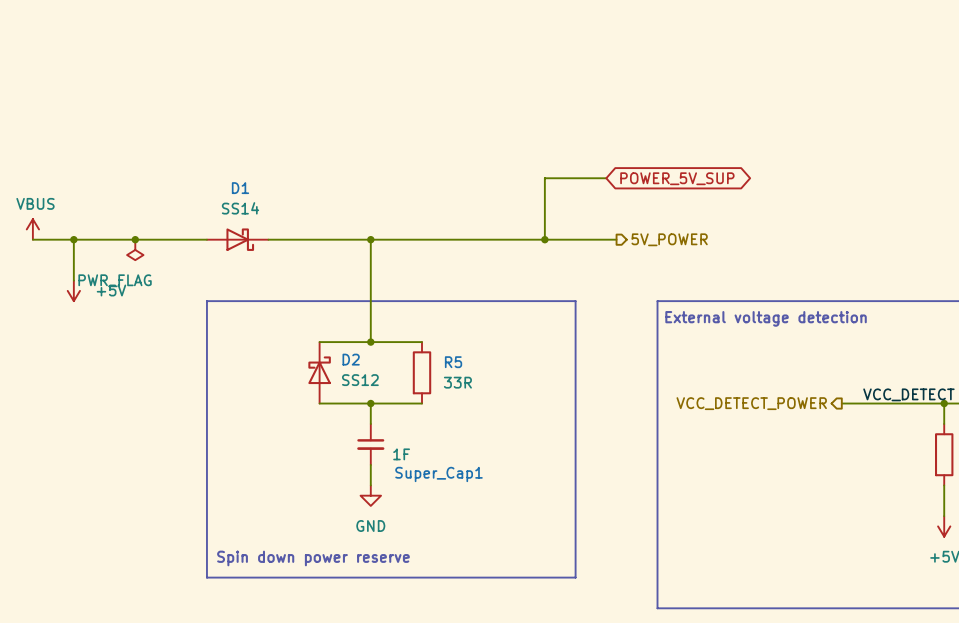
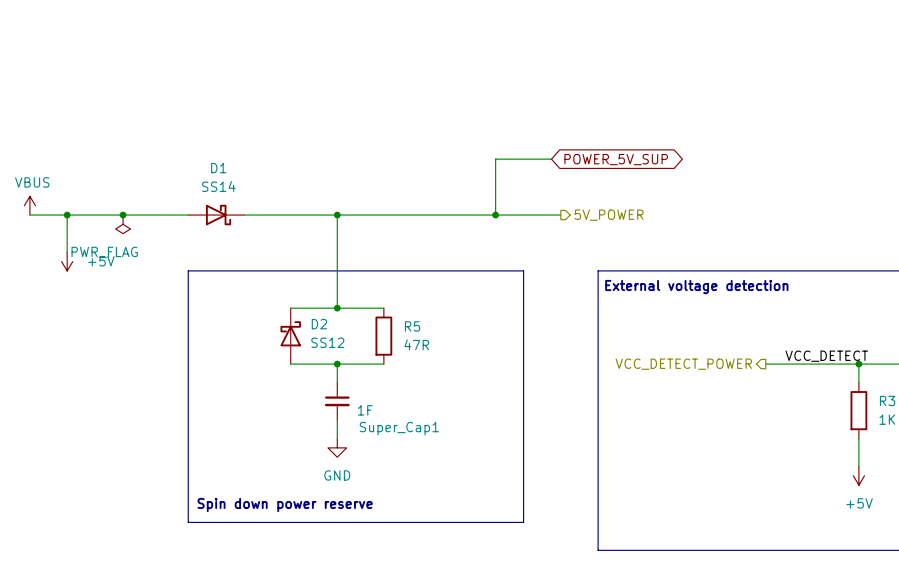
R5 value: 33R (457, 382) -> 47R (416, 344)

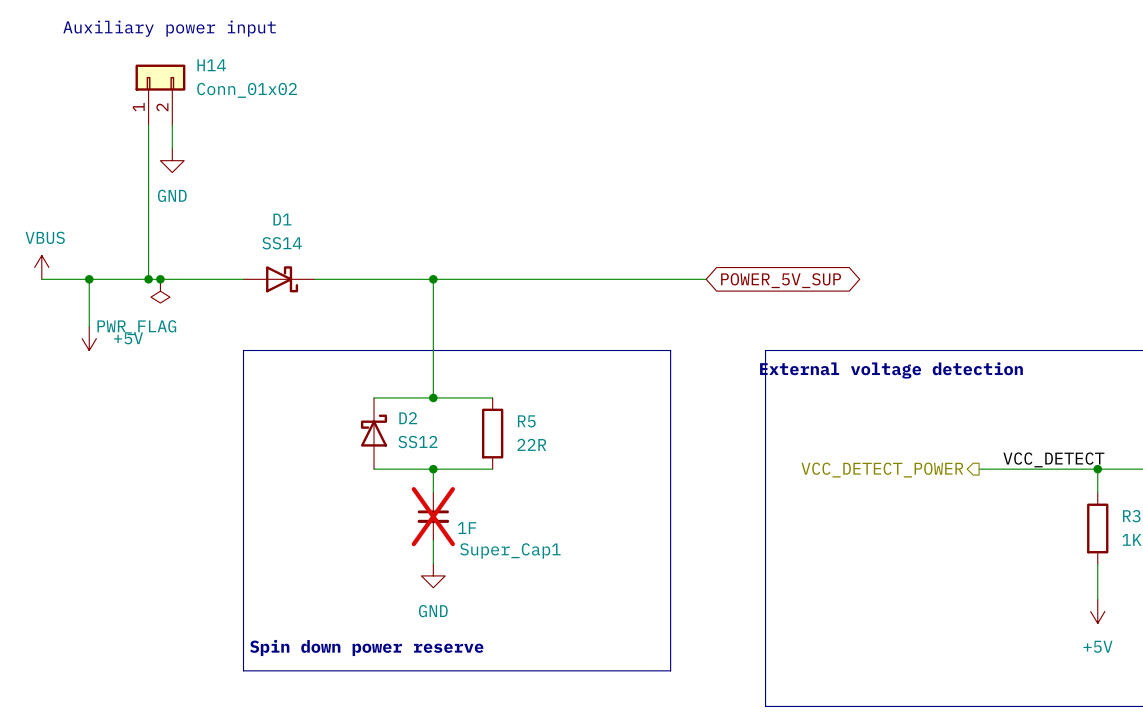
text: none -> Auxiliary power input (169, 28)
H14: none -> Conn_01x02 (160, 94)
wire: none -> (148, 125) (148, 279)
wire: none -> (172, 125) (172, 148)
power symbol: none -> GND (172, 160)
wire: (551, 159) (495, 159) (495, 215) -> none
global label position: POWER_5V_SUP (616, 159) -> POWER_5V_SUP (781, 280)
junction: none -> (148, 279)
junction: (495, 215) -> none
wire: (551, 215) (560, 215) -> none
hierarchical label: 5V_POWER (609, 215) -> none
R5 value: 47R (416, 344) -> 22R (531, 444)
Super_Cap1 do-not-place cross: none -> (433, 516)

